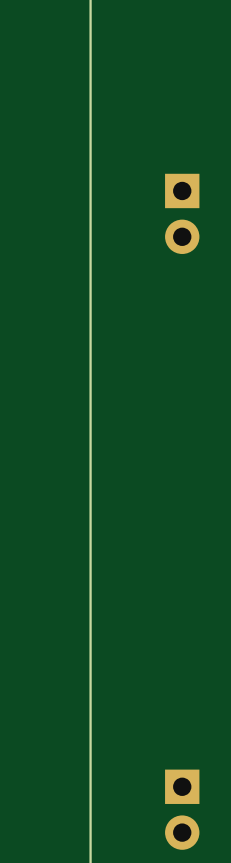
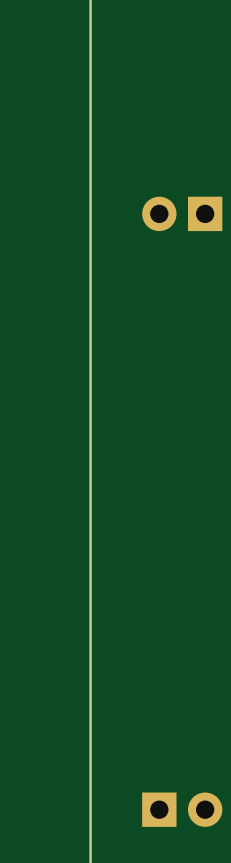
part rotation: 0° (182, 213) -> 90° clockwise (182, 213)
part rotation: 0° (182, 809) -> 90° counterclockwise (182, 809)

